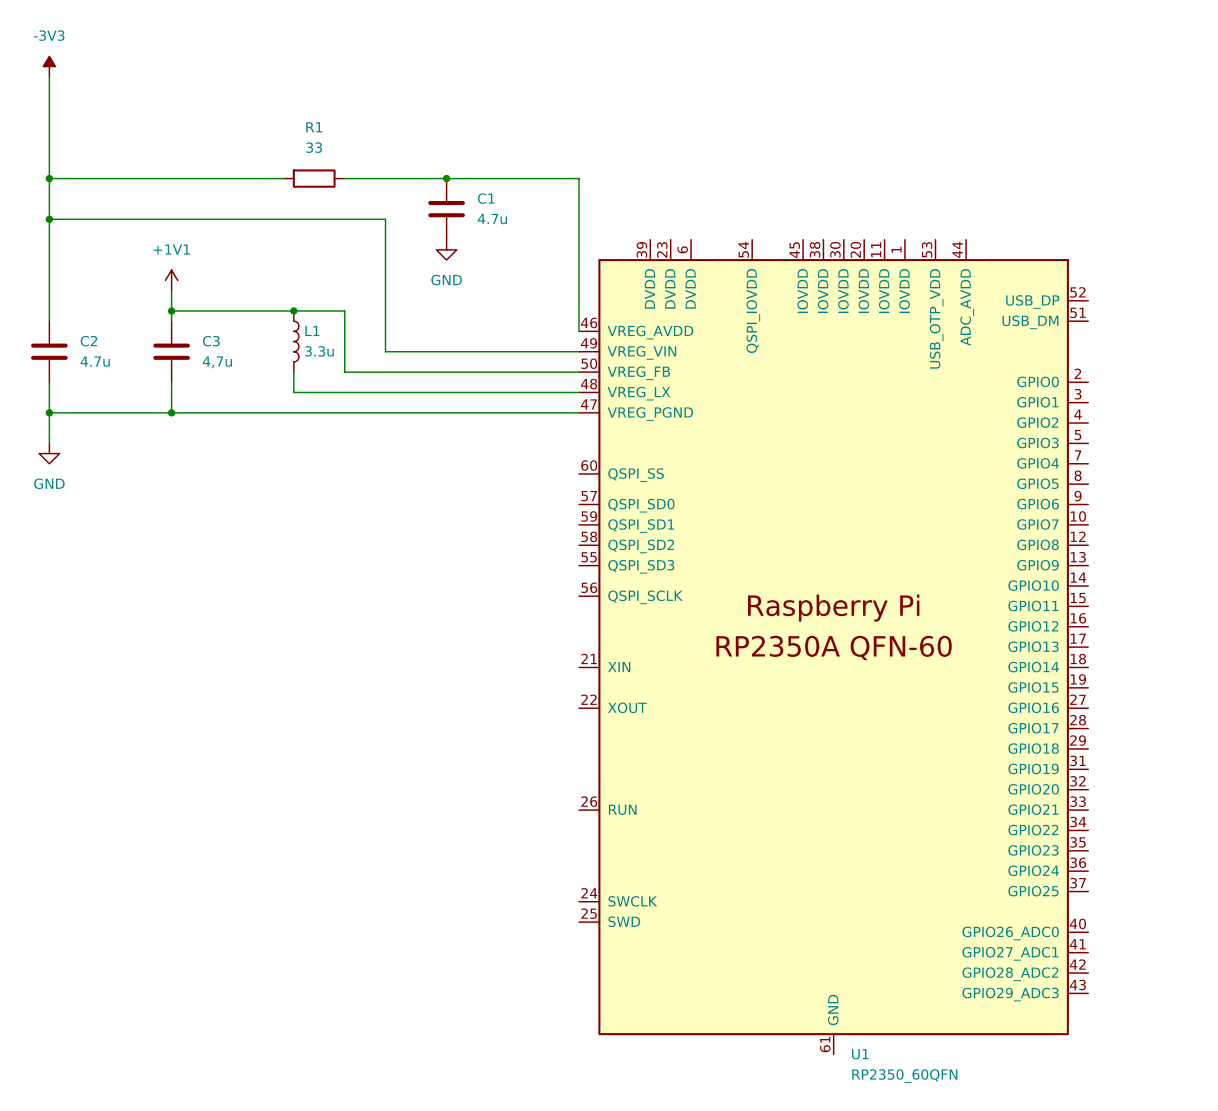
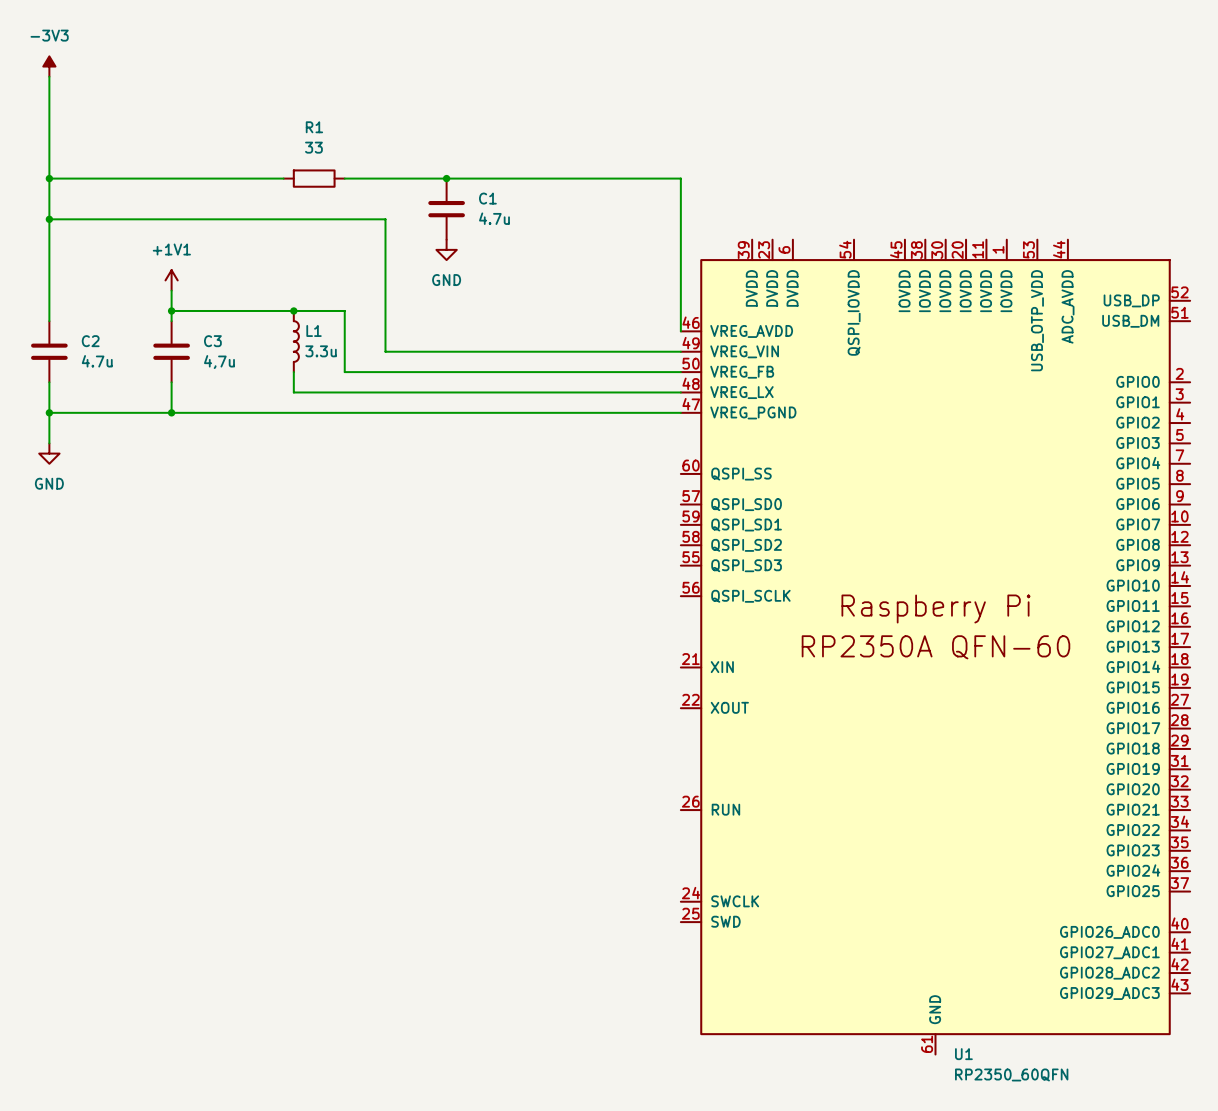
wire: (579, 178) (579, 331) -> (579, 178) (680, 178) (680, 331)
U1 position: (833, 647) -> (935, 647)

